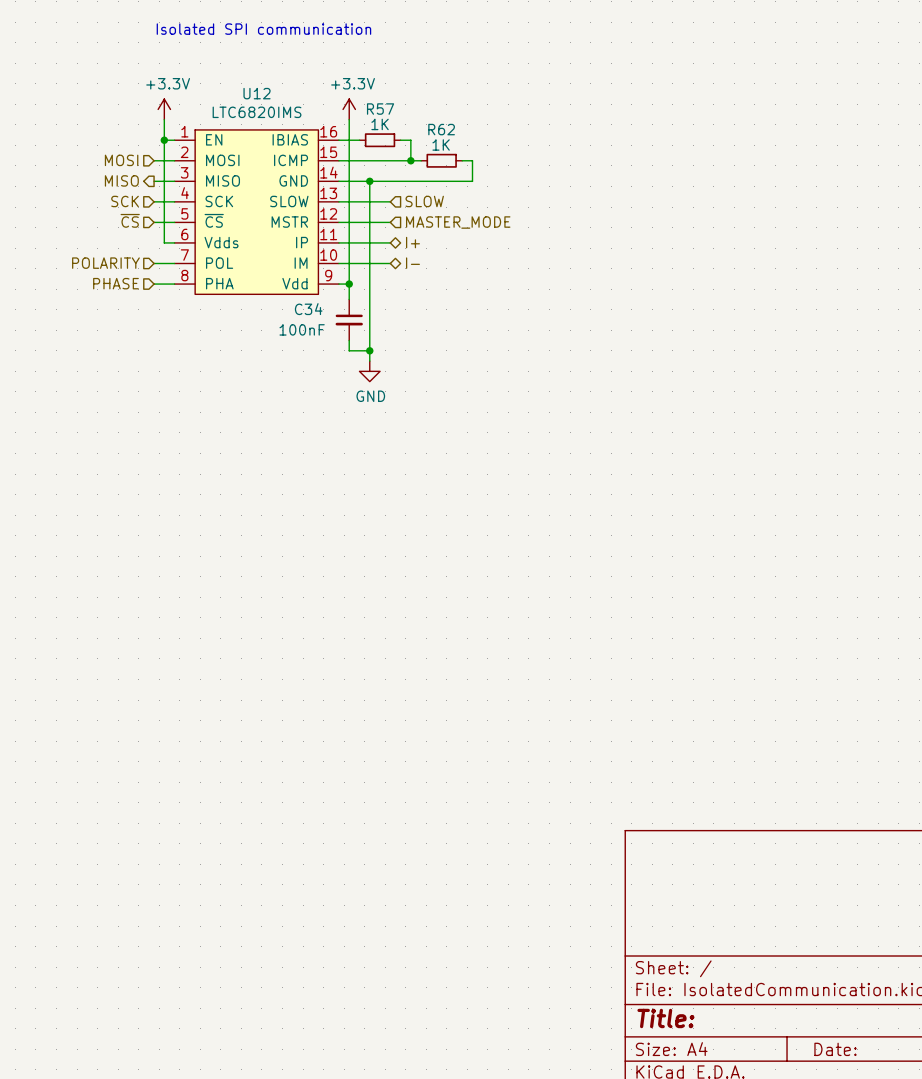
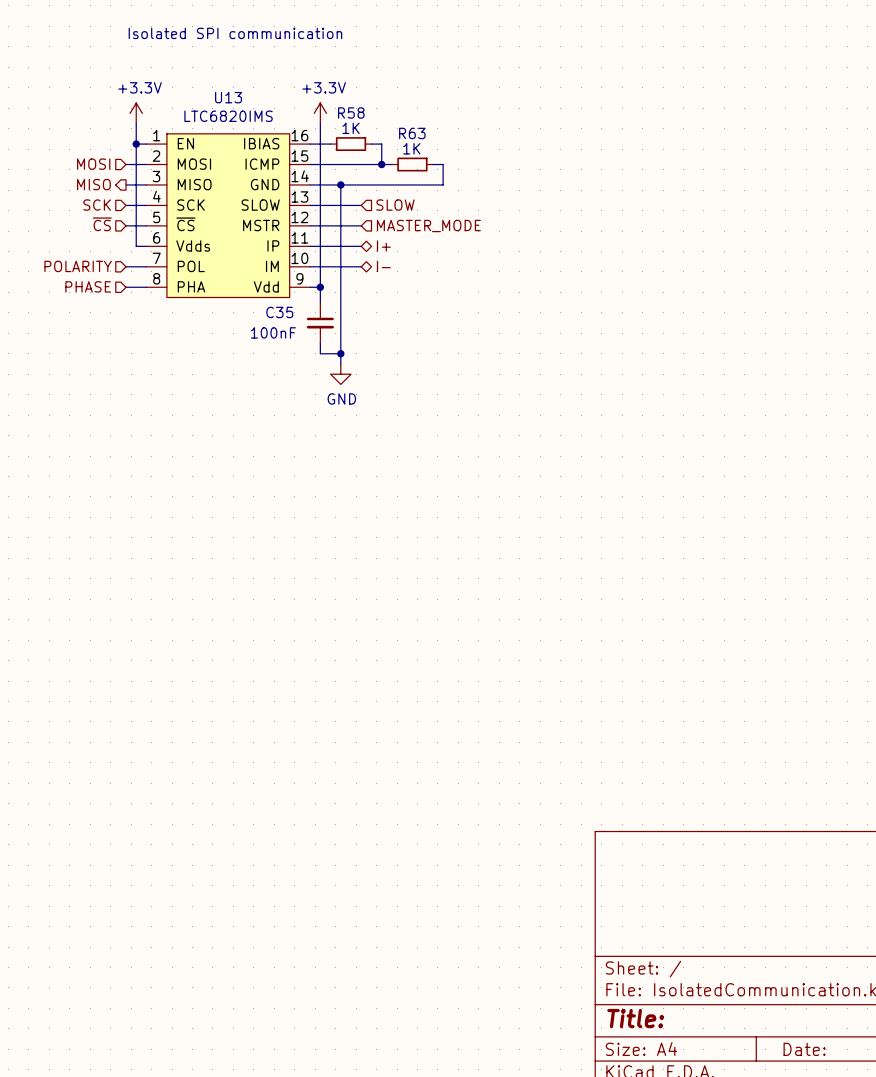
U12 name: U12 (257, 93) -> U13 (228, 97)
R57 name: R57 (380, 109) -> R58 (351, 112)
R62 name: R62 (441, 129) -> R63 (412, 133)
C34 name: C34 (308, 309) -> C35 (279, 312)

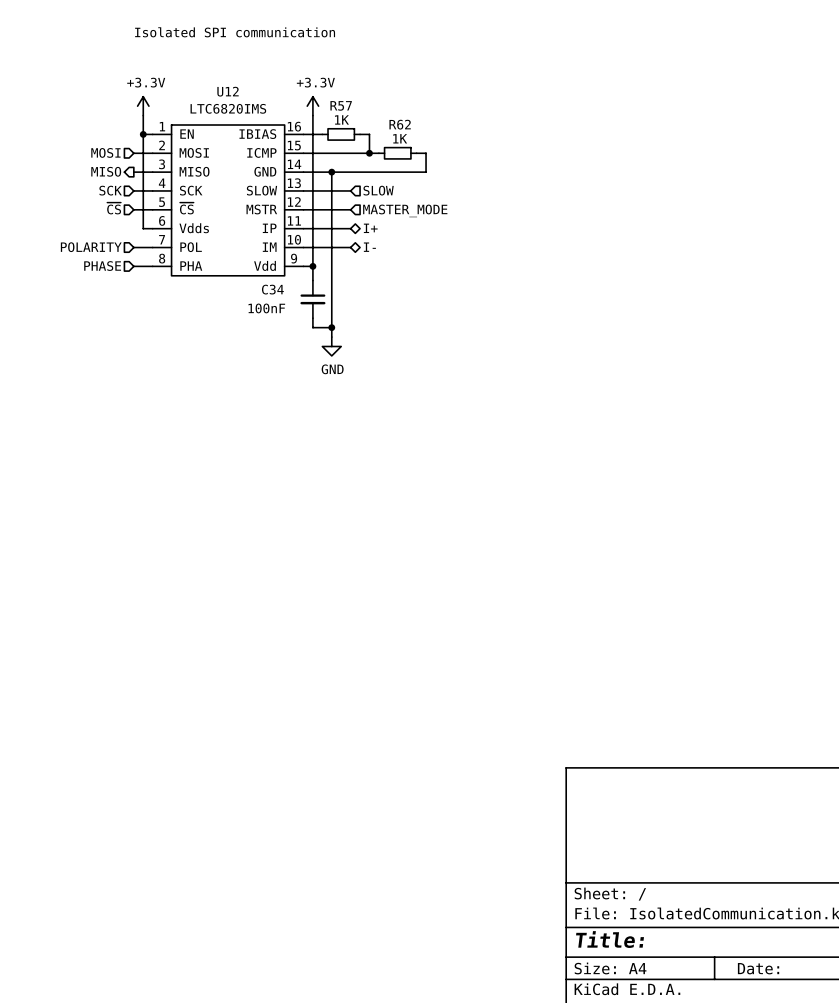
U13 name: U13 (228, 97) -> U12 (228, 91)
R58 name: R58 (351, 112) -> R57 (341, 105)
R63 name: R63 (412, 133) -> R62 (400, 124)
C35 name: C35 (279, 312) -> C34 (272, 289)

